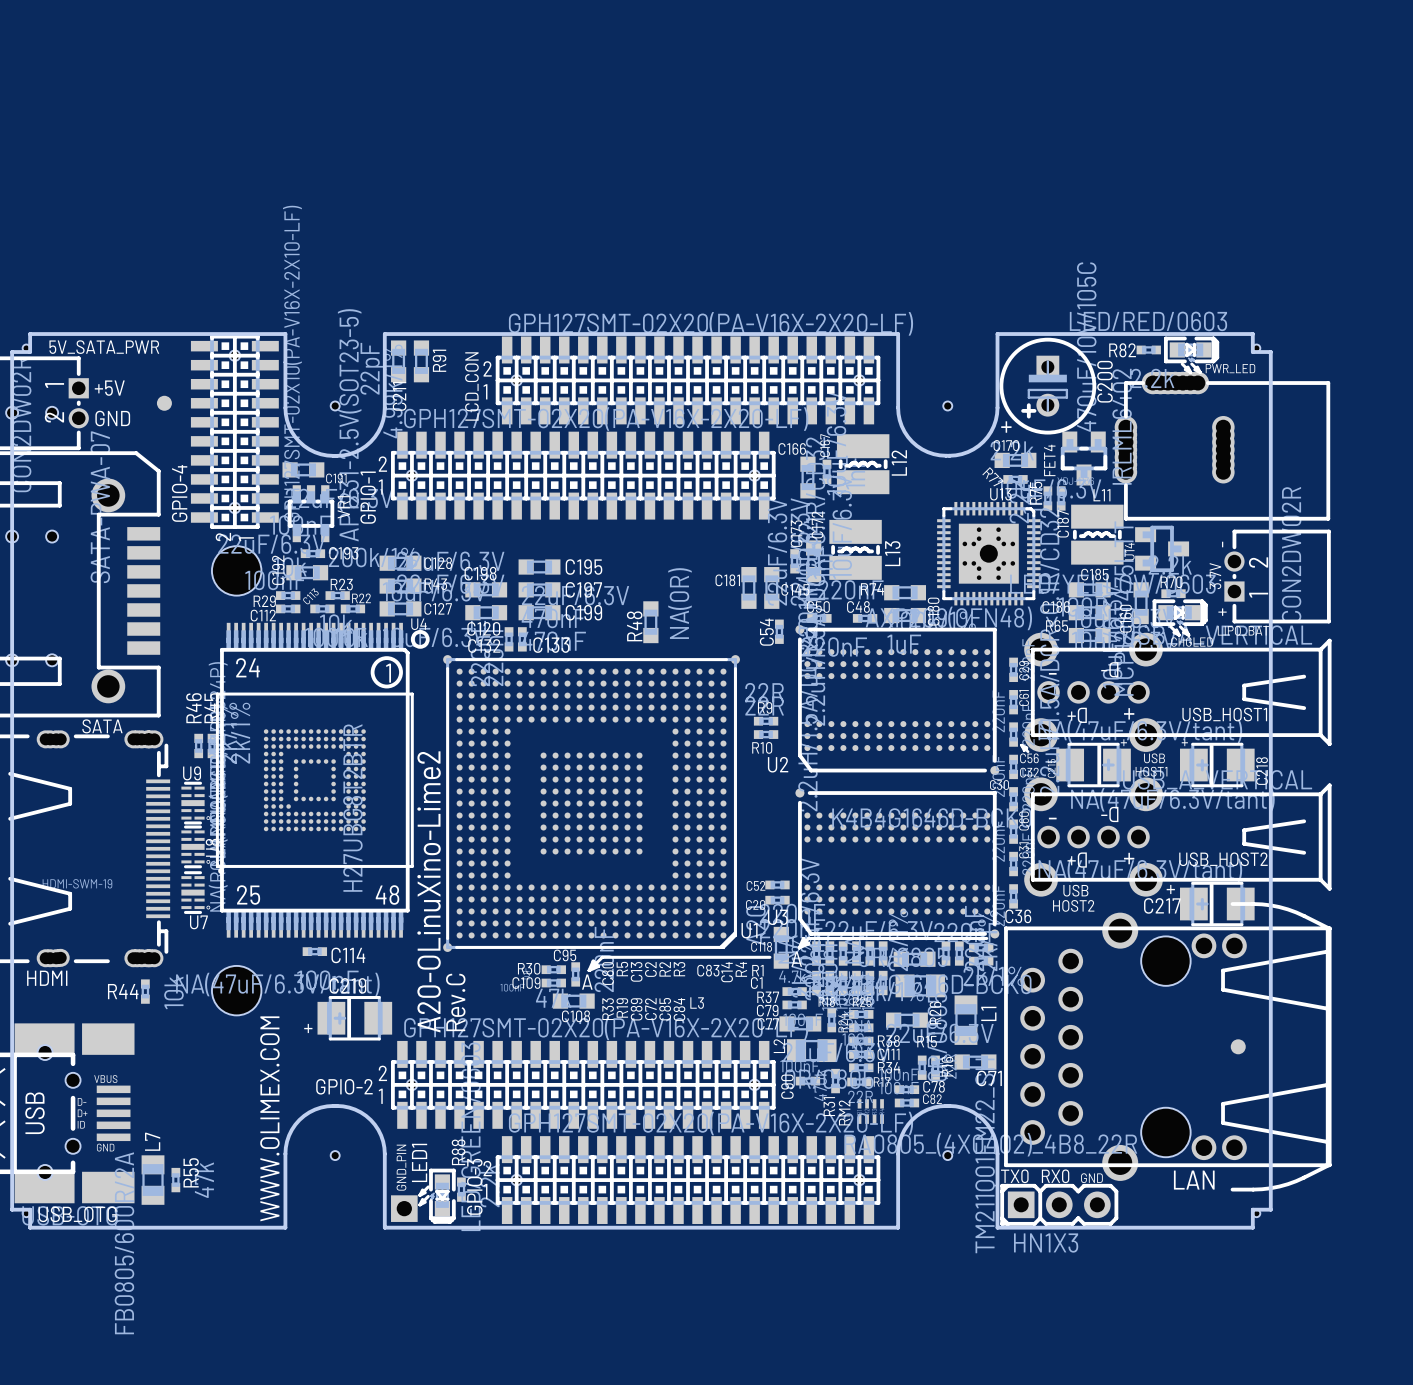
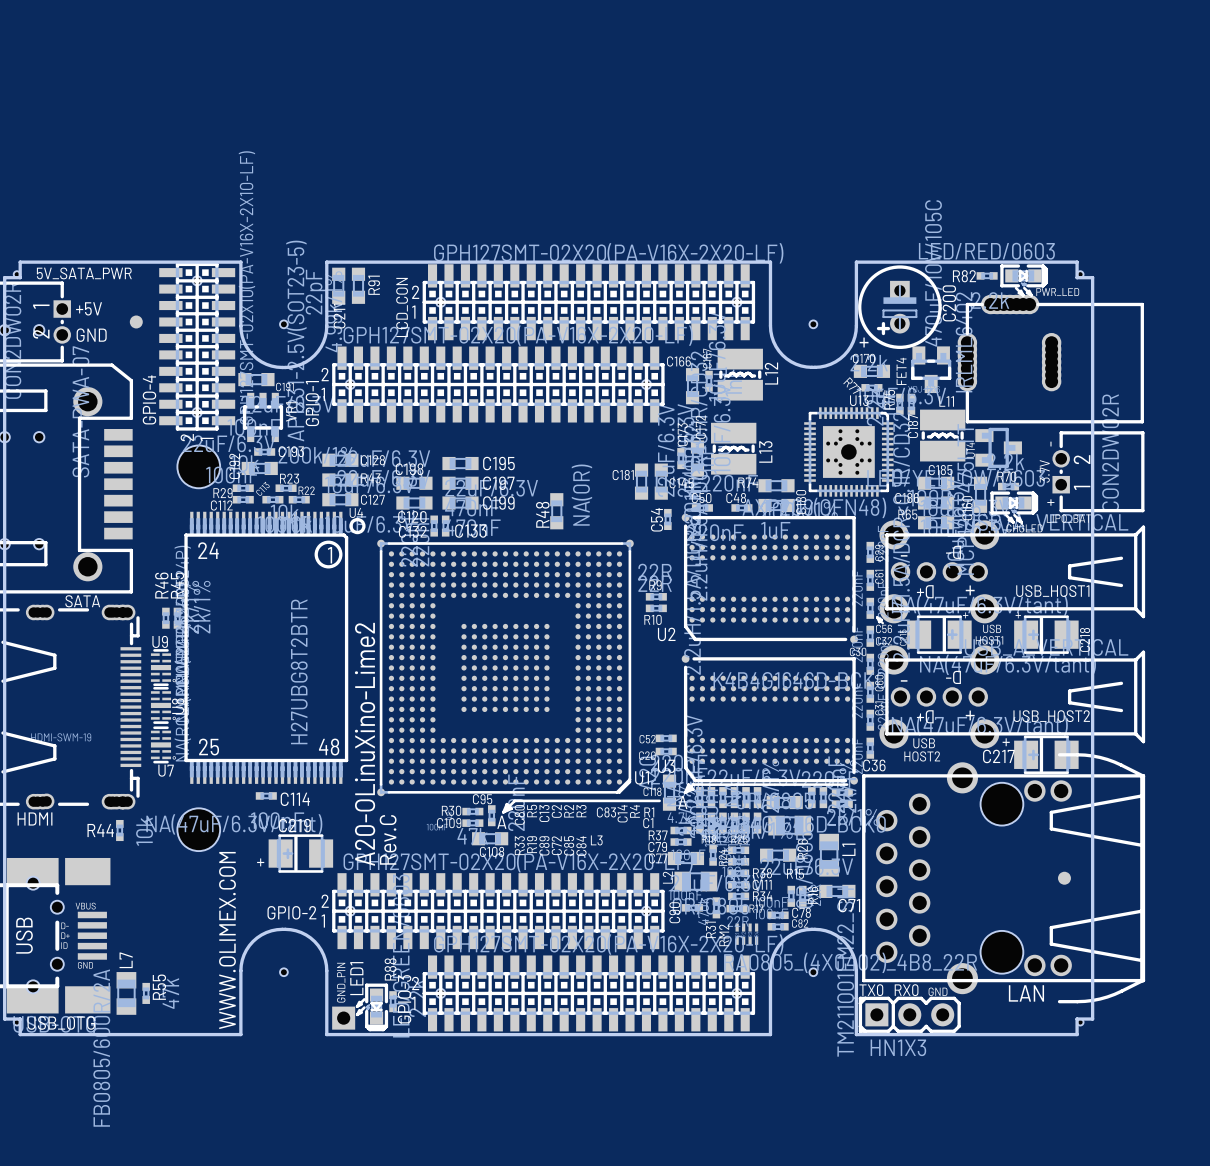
part: (314, 783) -> none

